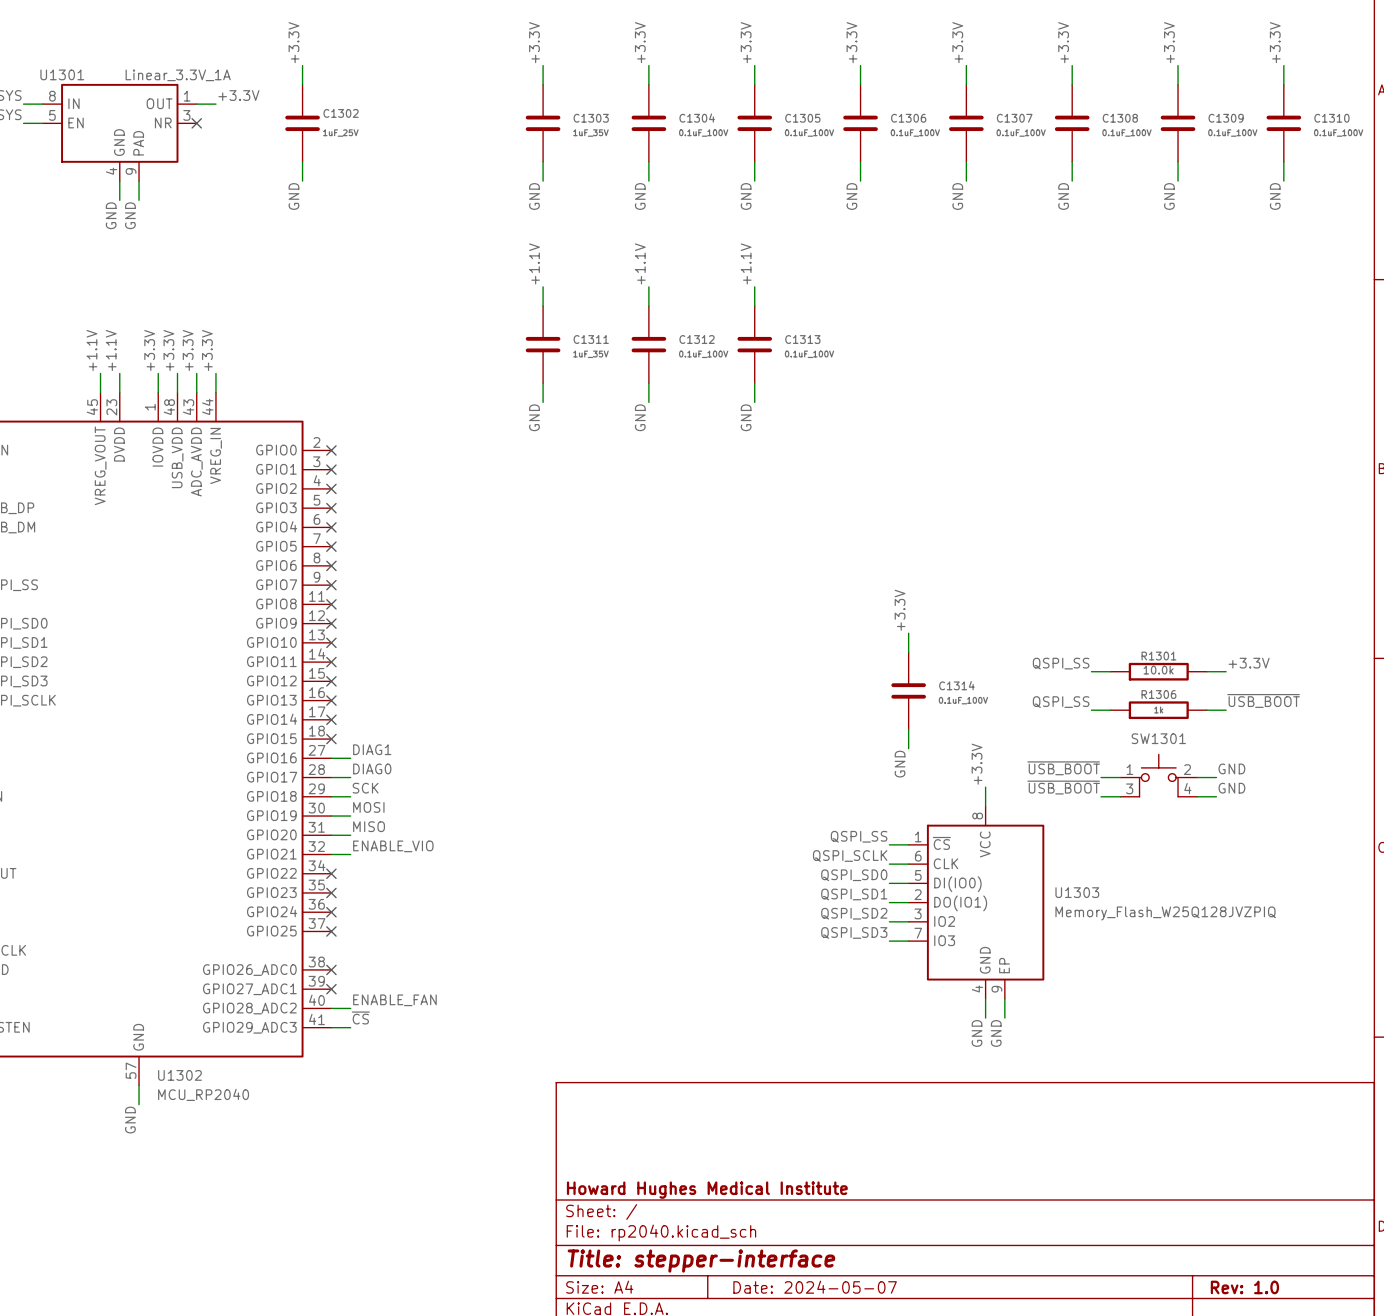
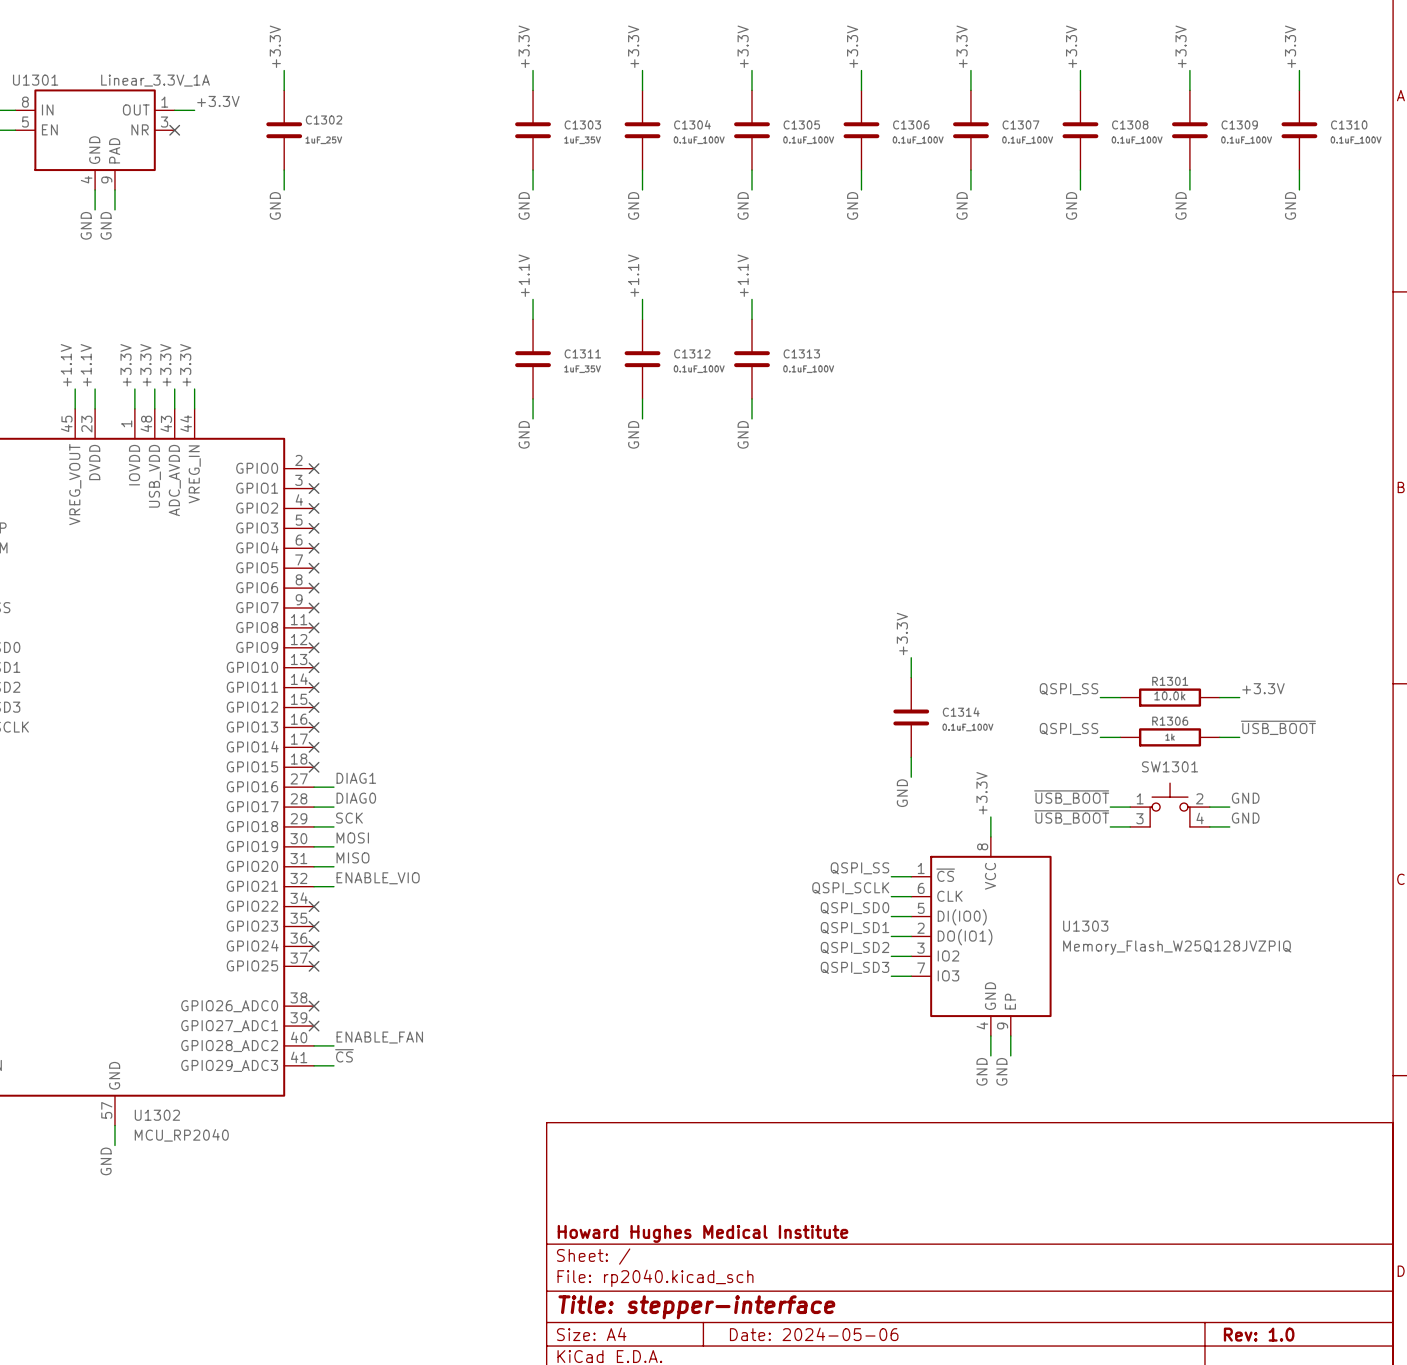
title block: Date: 2024-05-07 (815, 1287) -> Date: 2024-05-06 (814, 1334)

